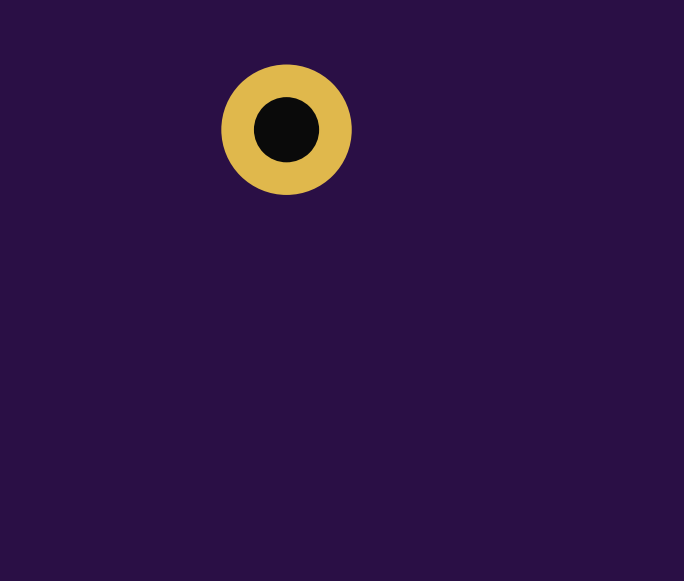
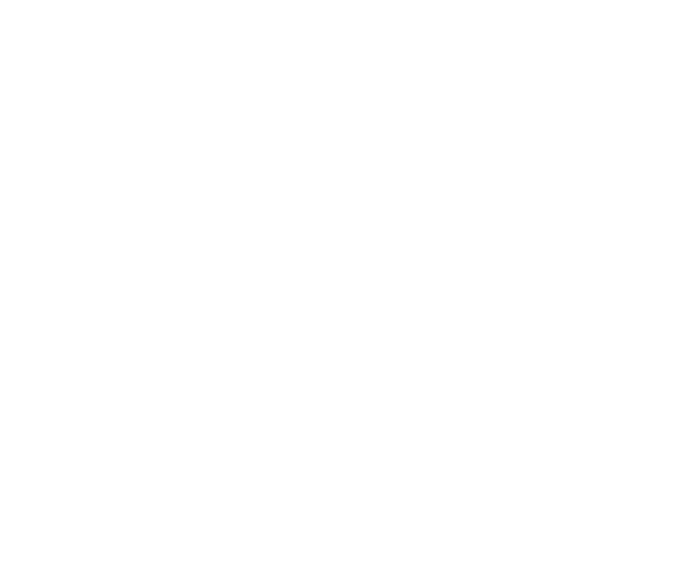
part: (286, 129) -> none

